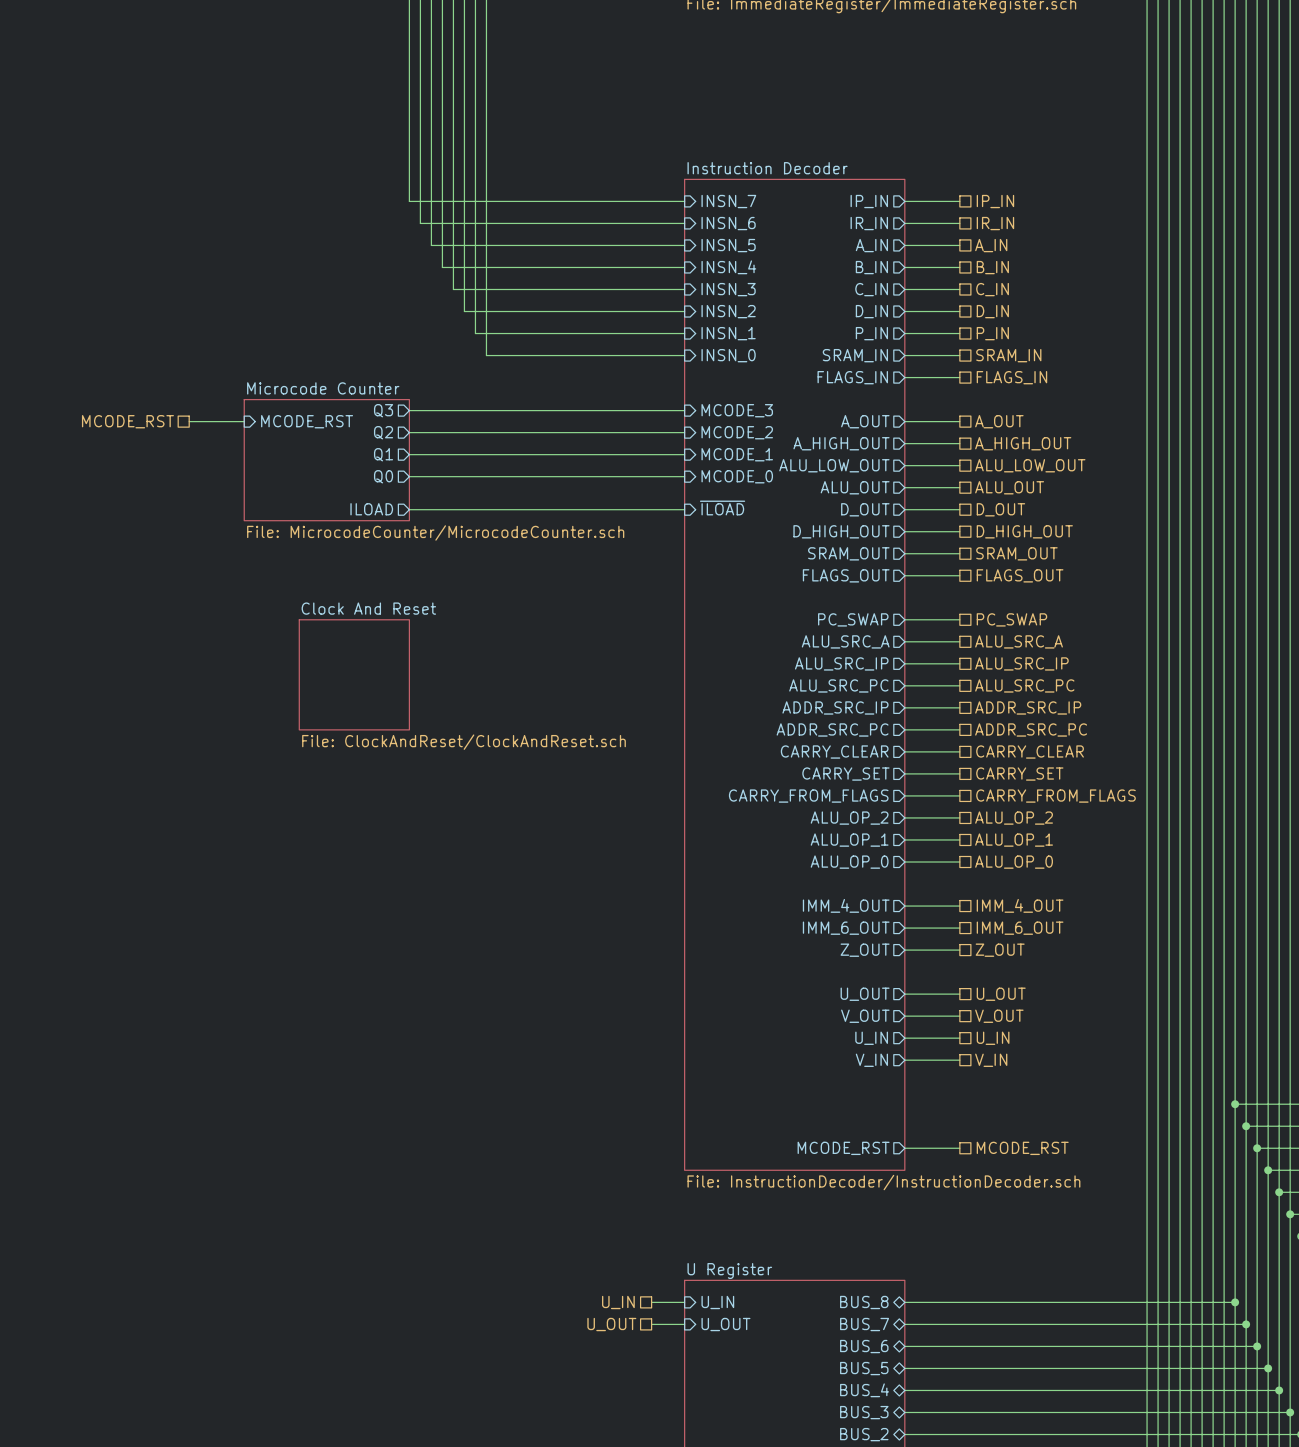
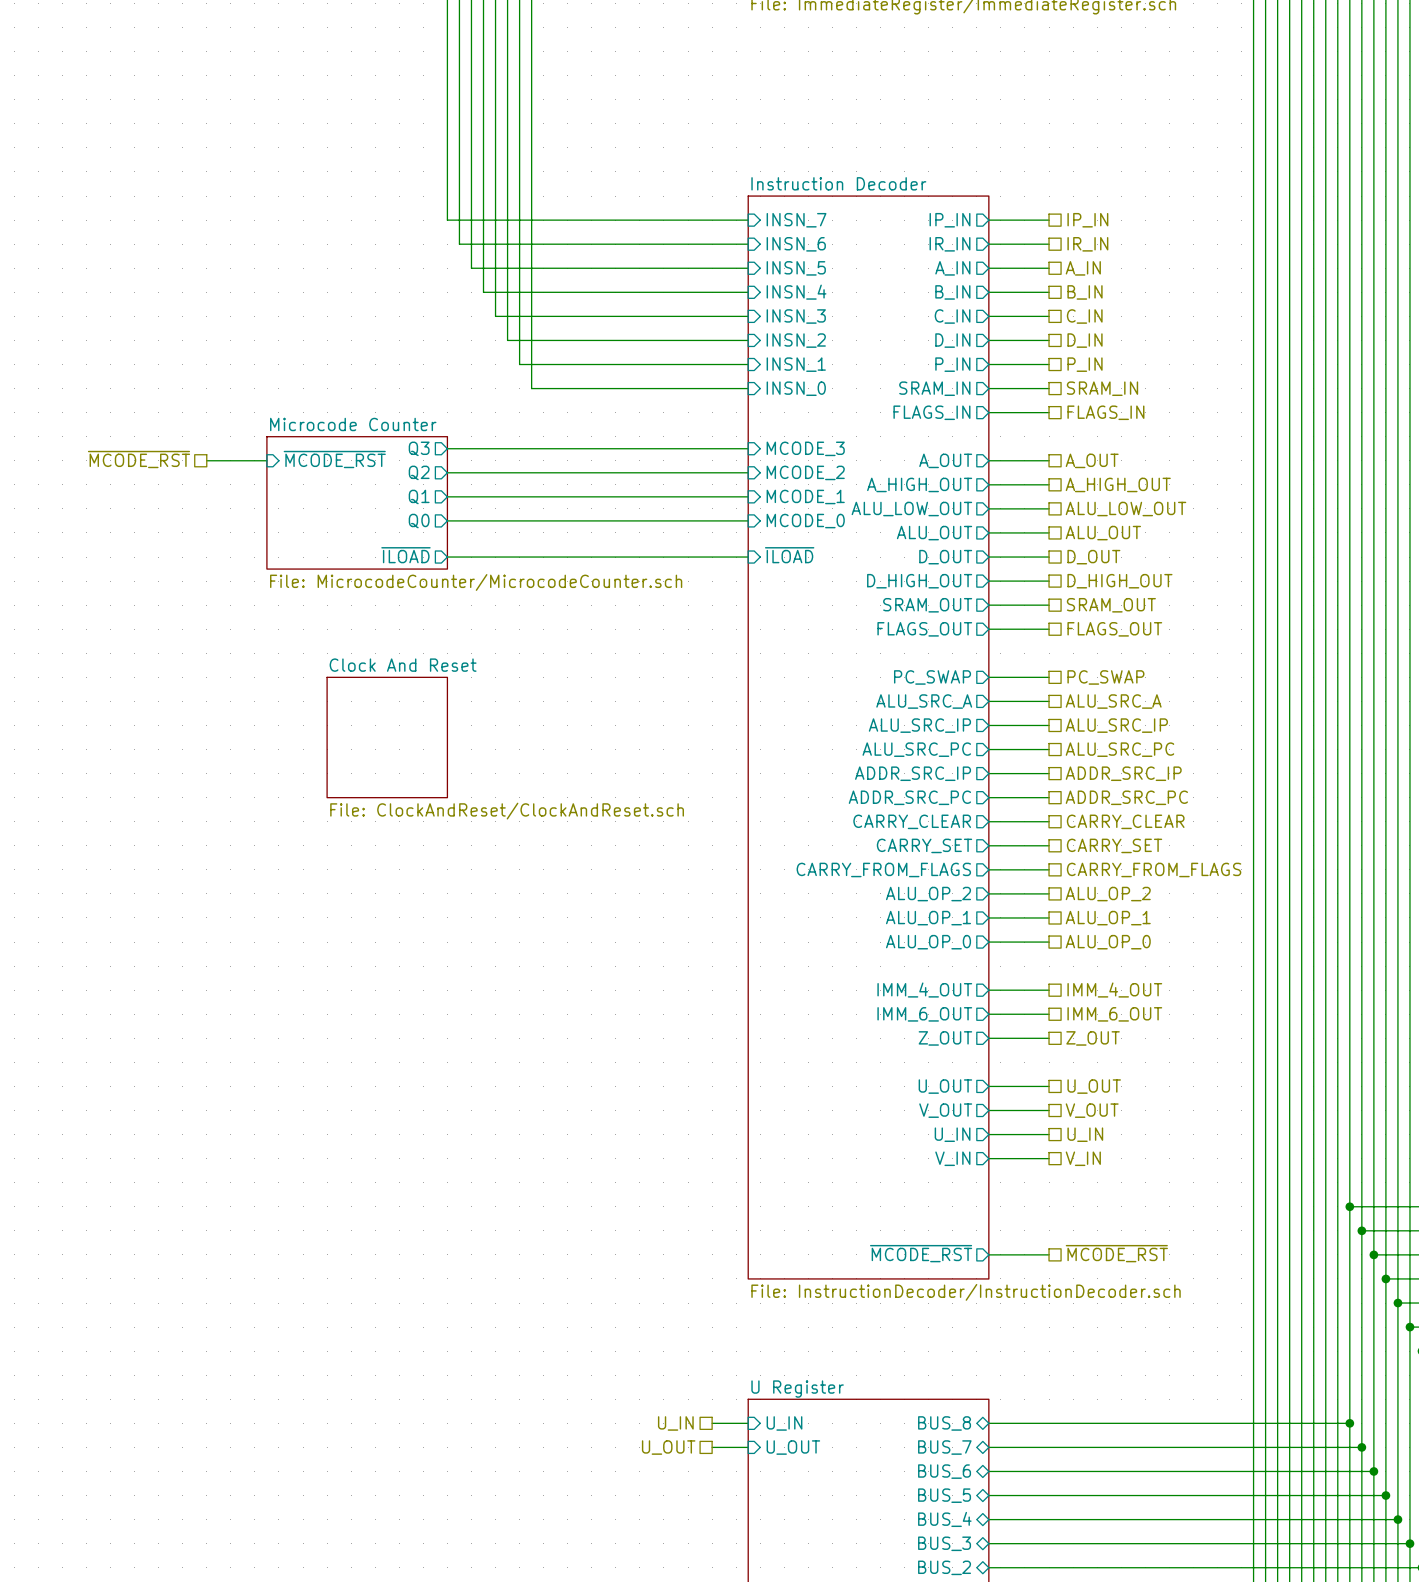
hierarchical label: MCODE_RST (127, 421) -> ~{MCODE_RST} (139, 459)
sheet pin: MCODE_RST (307, 421) -> ~{MCODE_RST} (334, 459)
sheet pin: ILOAD (371, 509) -> ~{ILOAD} (405, 555)
sheet pin: MCODE_RST (843, 1148) -> ~{MCODE_RST} (921, 1253)
hierarchical label: MCODE_RST (1022, 1148) -> ~{MCODE_RST} (1116, 1253)

